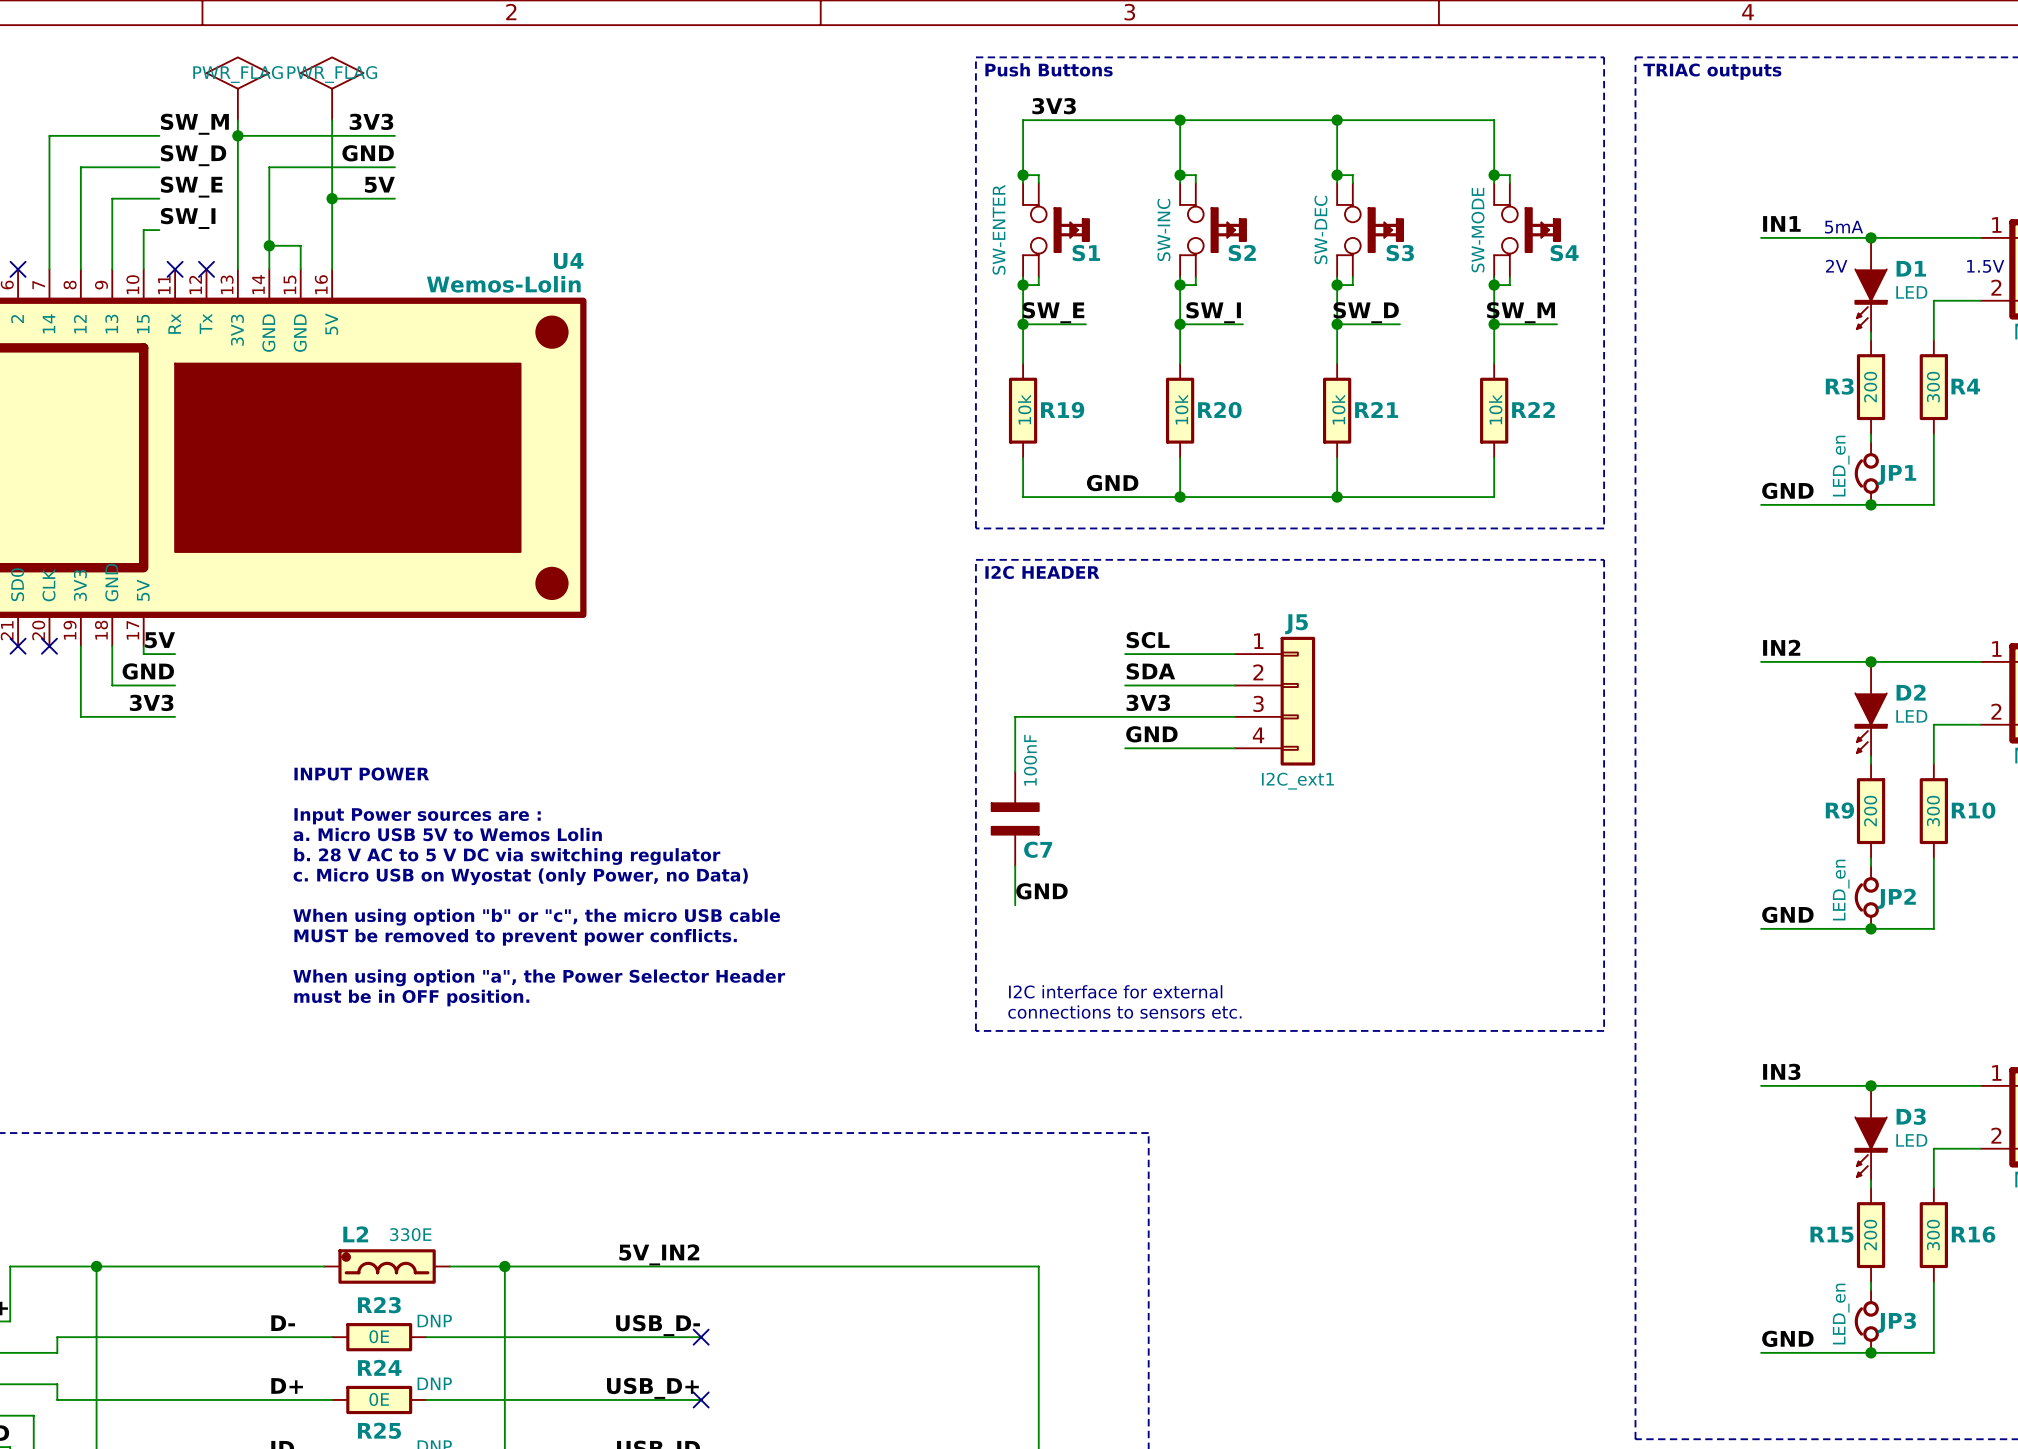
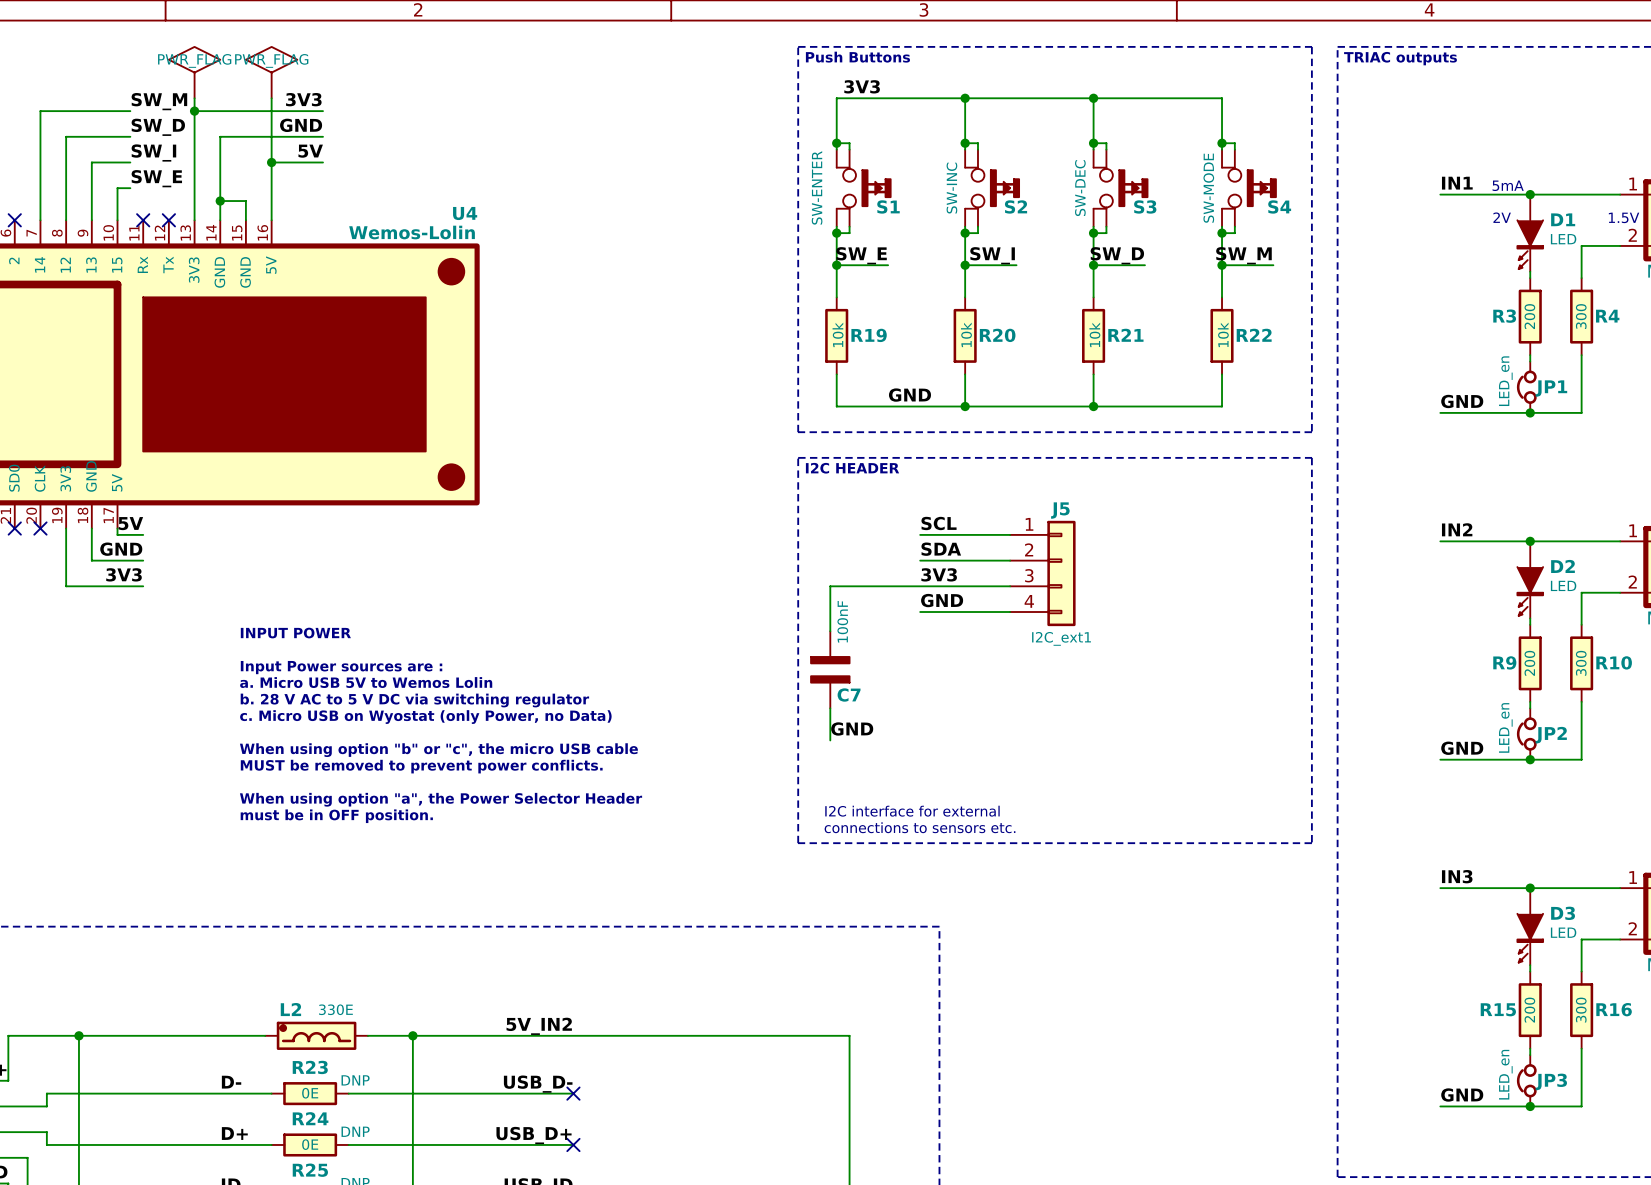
label: SW_E (191, 187) -> SW_I (153, 152)
label: SW_I (188, 218) -> SW_E (156, 178)

